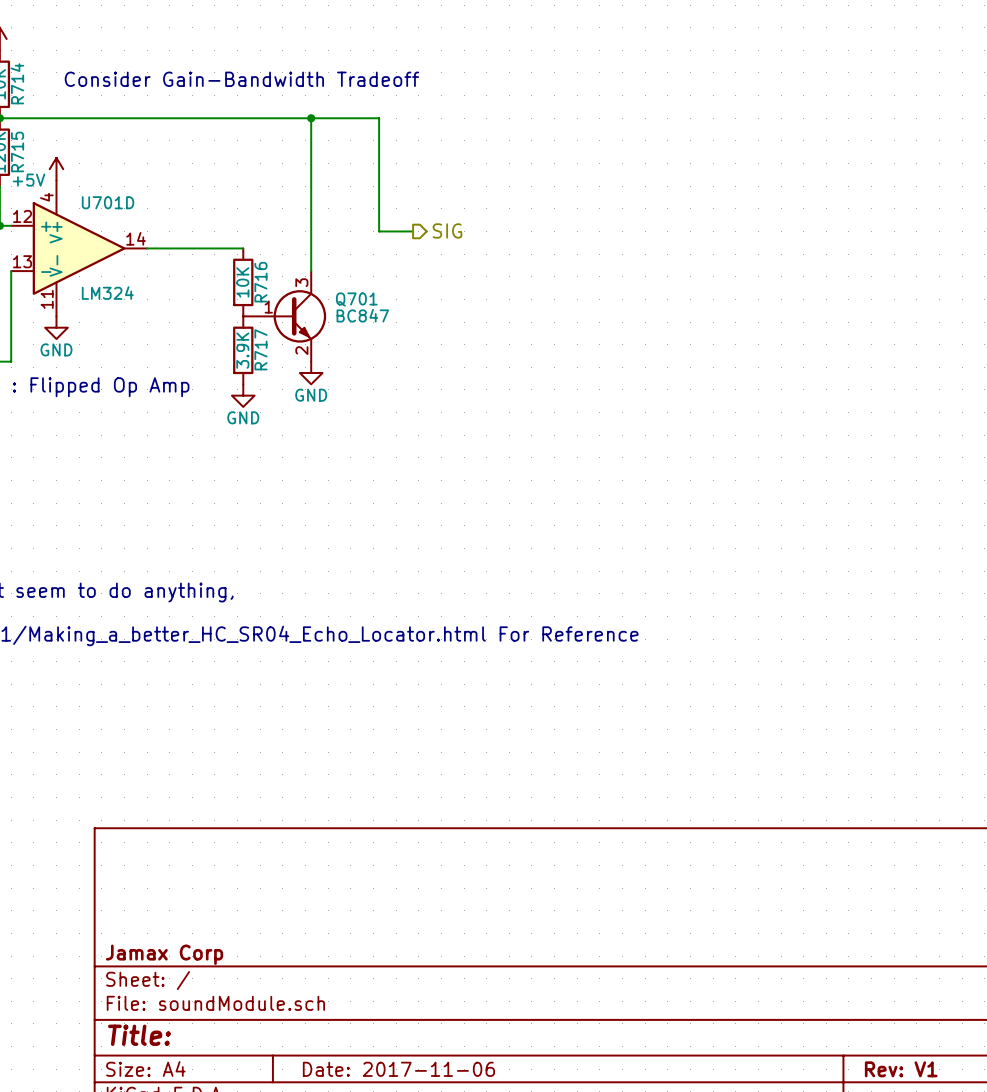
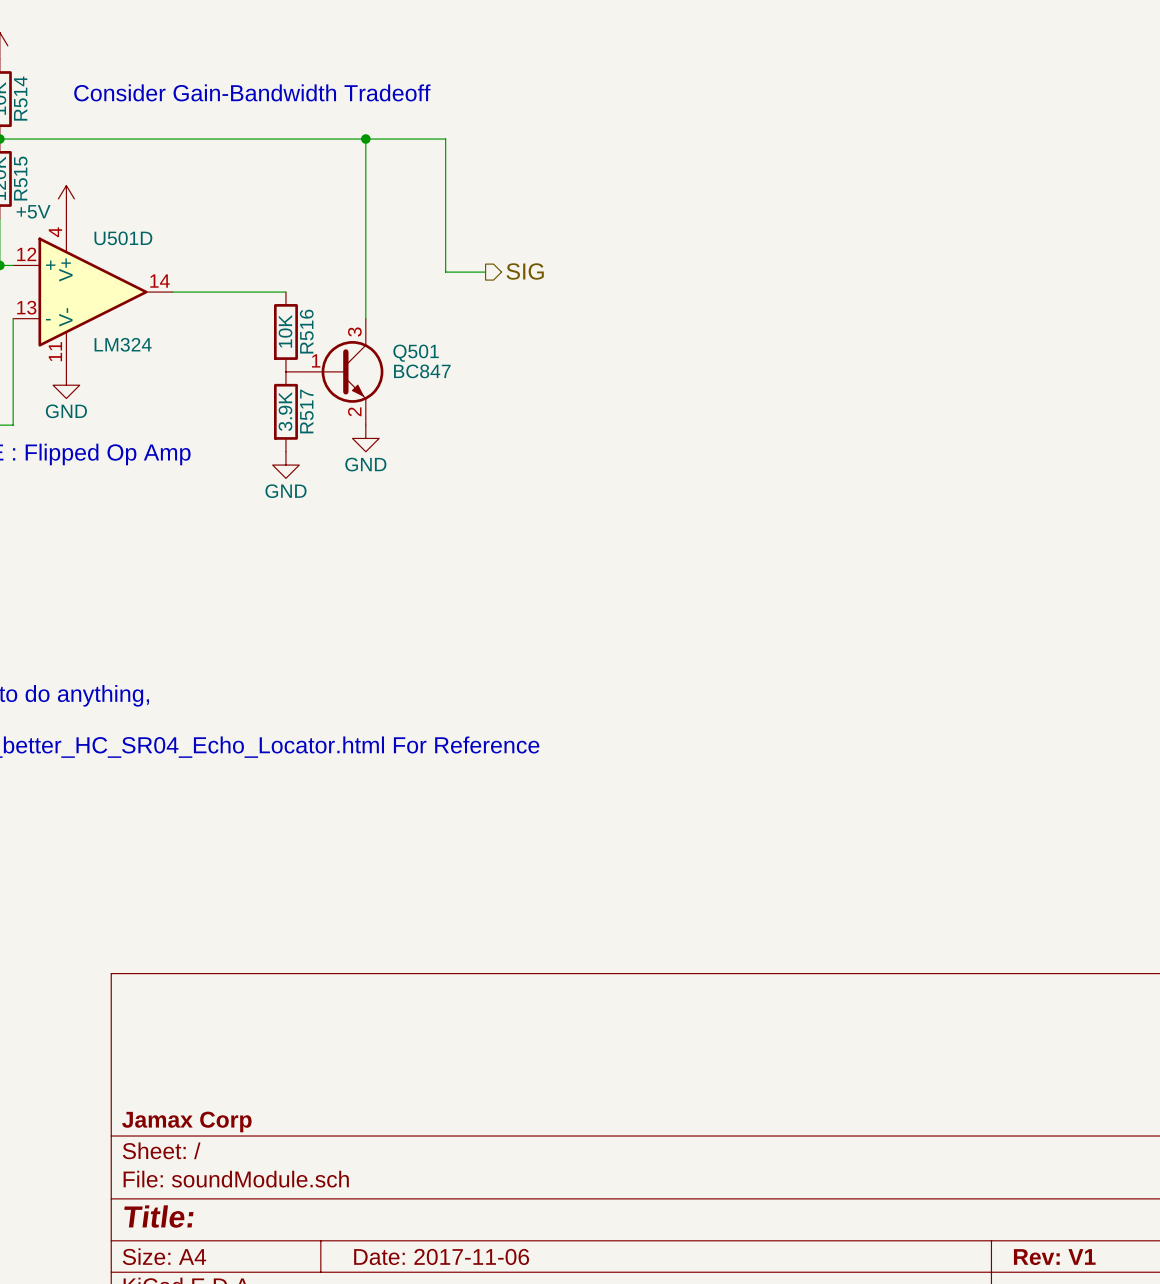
R714 name: R714 (17, 83) -> R514 (20, 98)
R715 name: R715 (17, 151) -> R515 (20, 178)
U701D name: U701D (108, 202) -> U501D (123, 238)
R716 name: R716 (260, 282) -> R516 (306, 331)
Q701 name: Q701 (356, 299) -> Q501 (416, 353)
R717 name: R717 (260, 349) -> R517 (306, 411)

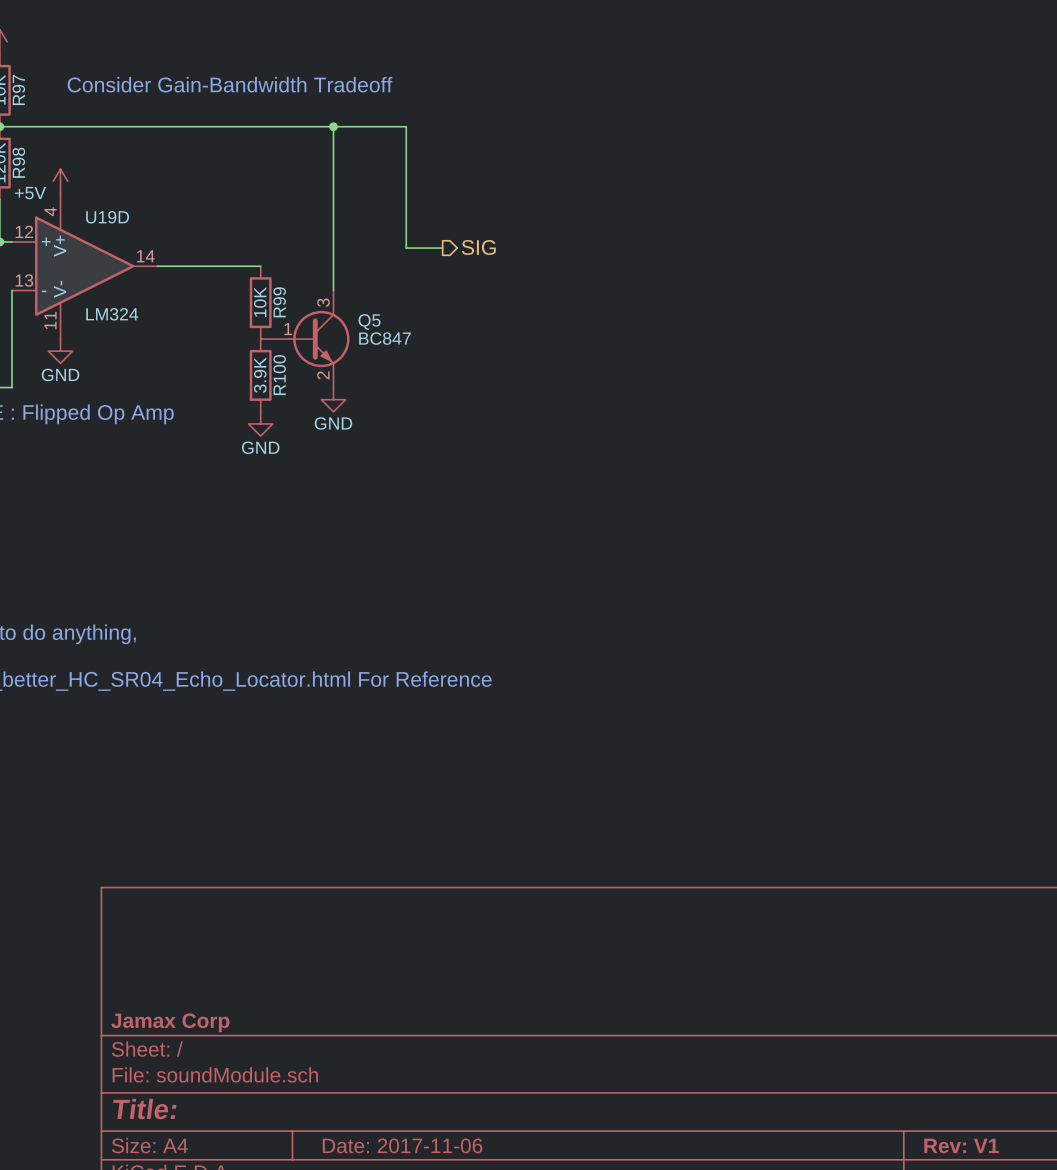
R514 name: R514 (20, 98) -> R97 (18, 90)
R515 name: R515 (20, 178) -> R98 (18, 162)
U501D name: U501D (123, 238) -> U19D (107, 217)
R516 name: R516 (306, 331) -> R99 (279, 302)
Q501 name: Q501 (416, 353) -> Q5 (369, 321)
R517 name: R517 (306, 411) -> R100 (279, 375)

